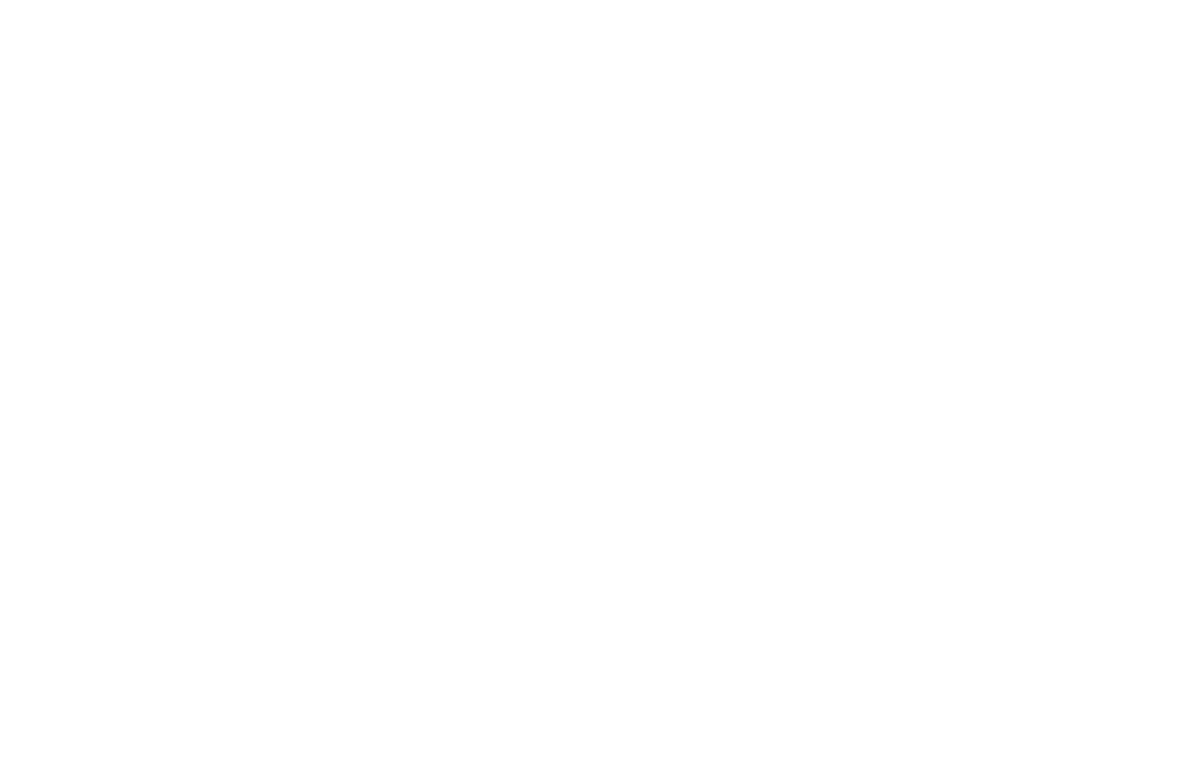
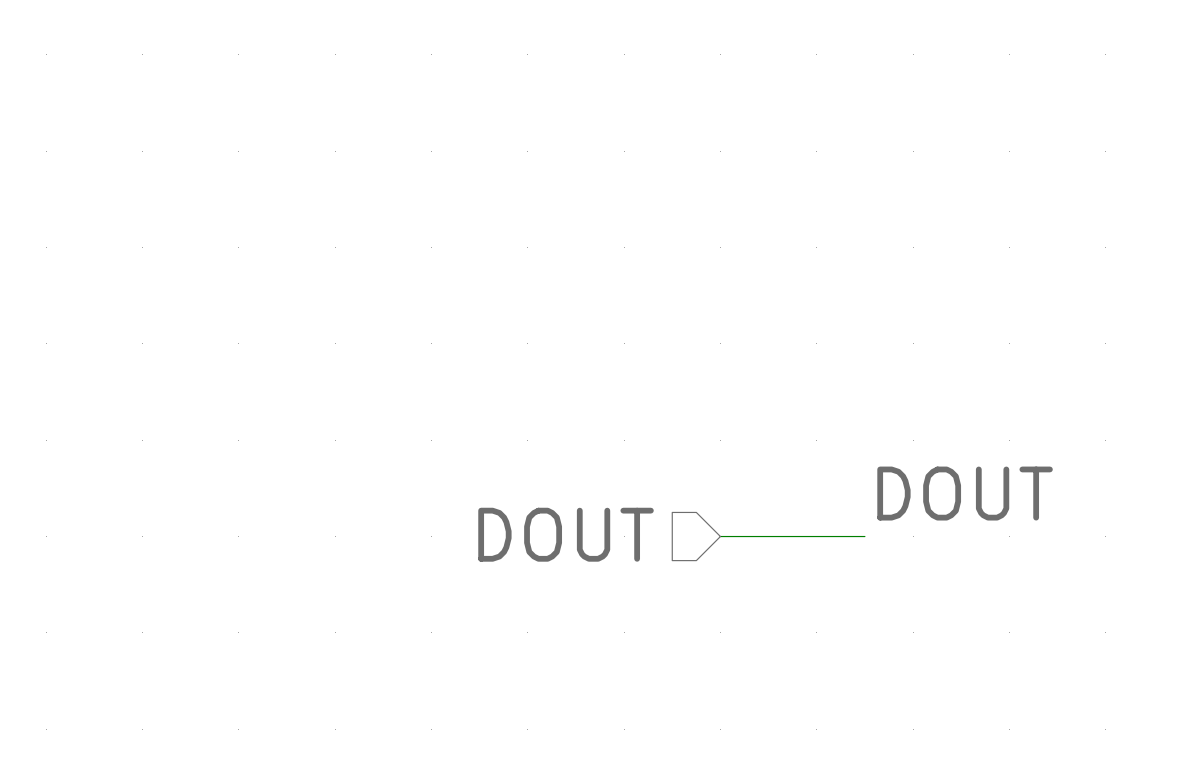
label: none -> DOUT (965, 493)
sheet pin: none -> DOUT (566, 534)
wire: none -> (720, 536) (864, 536)

